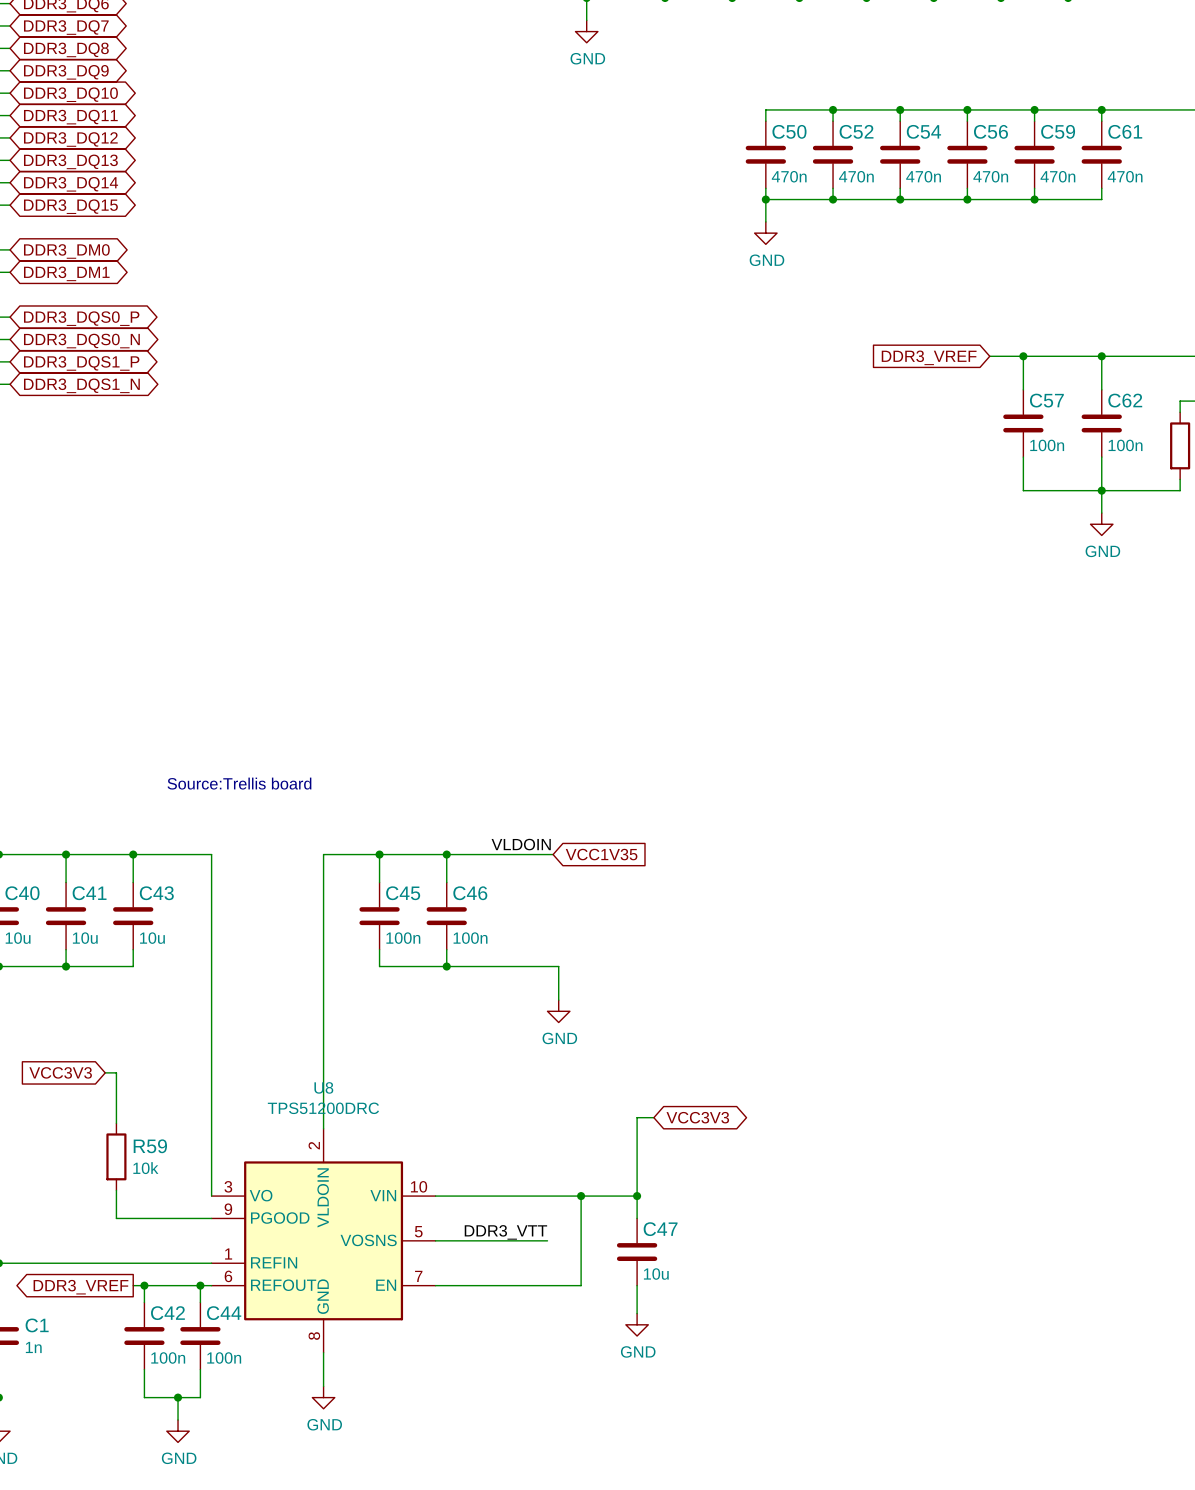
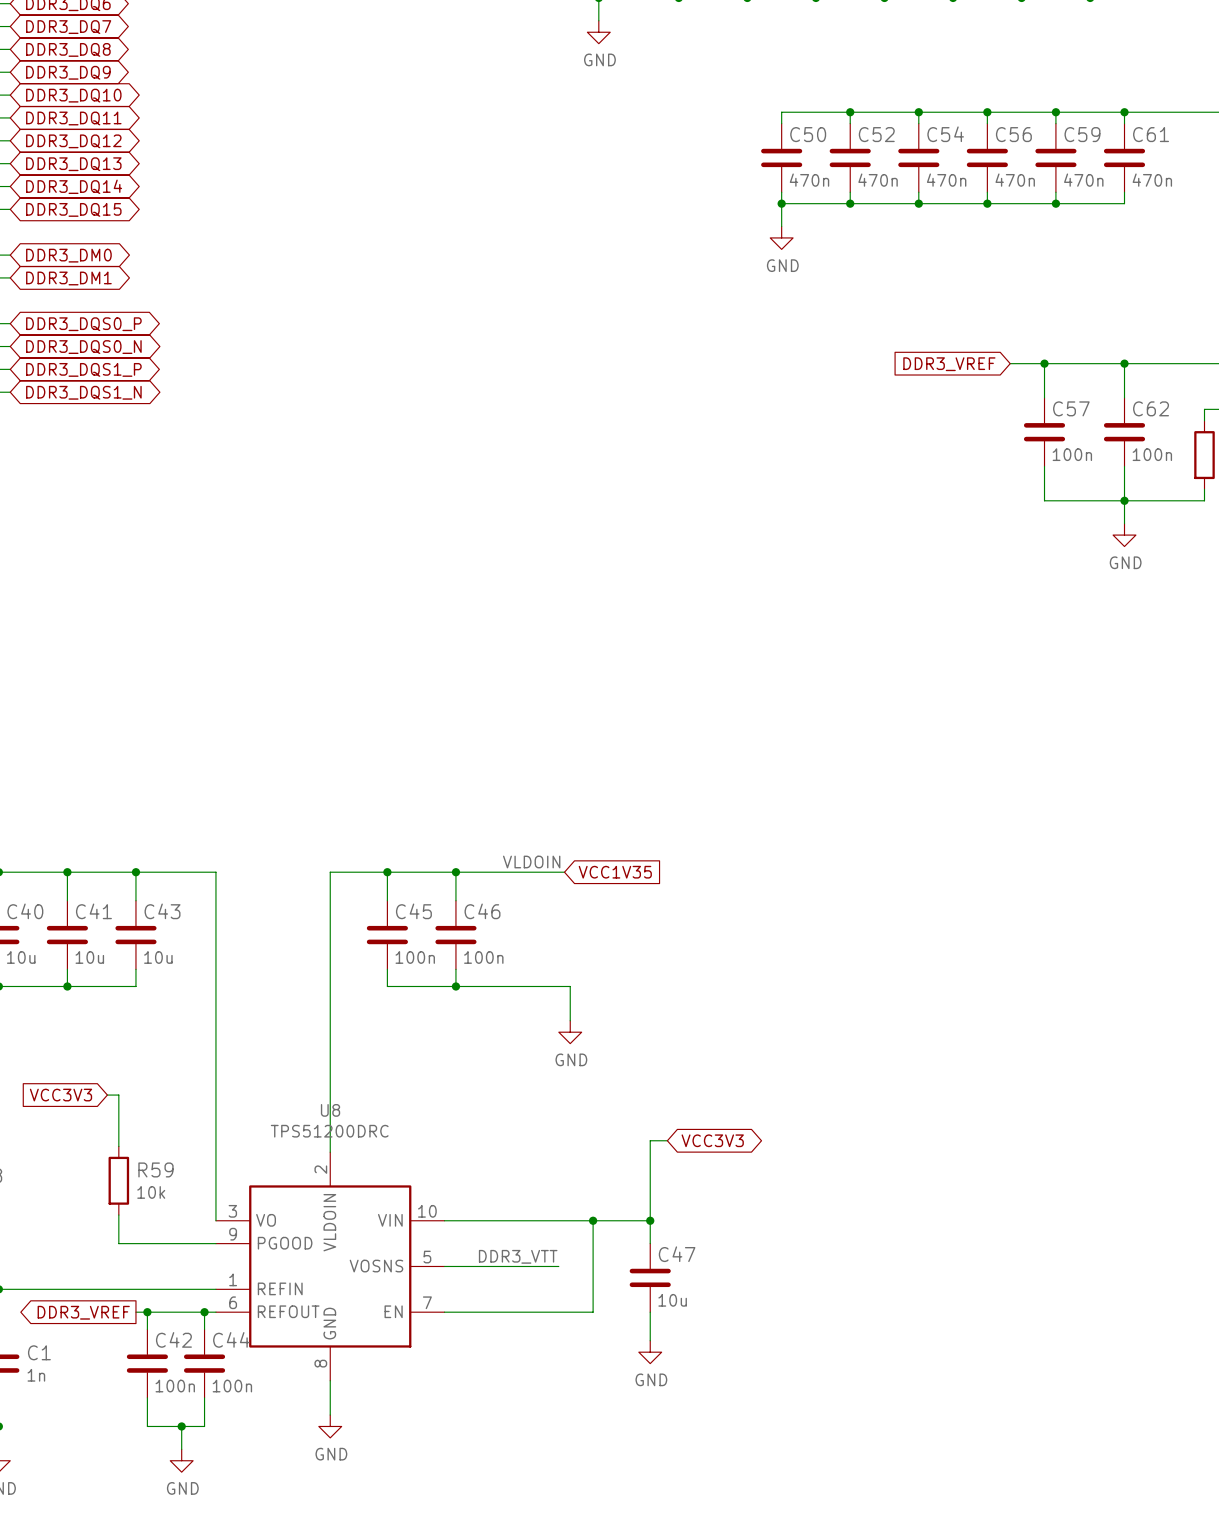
text: Source:Trellis board (239, 783) -> none

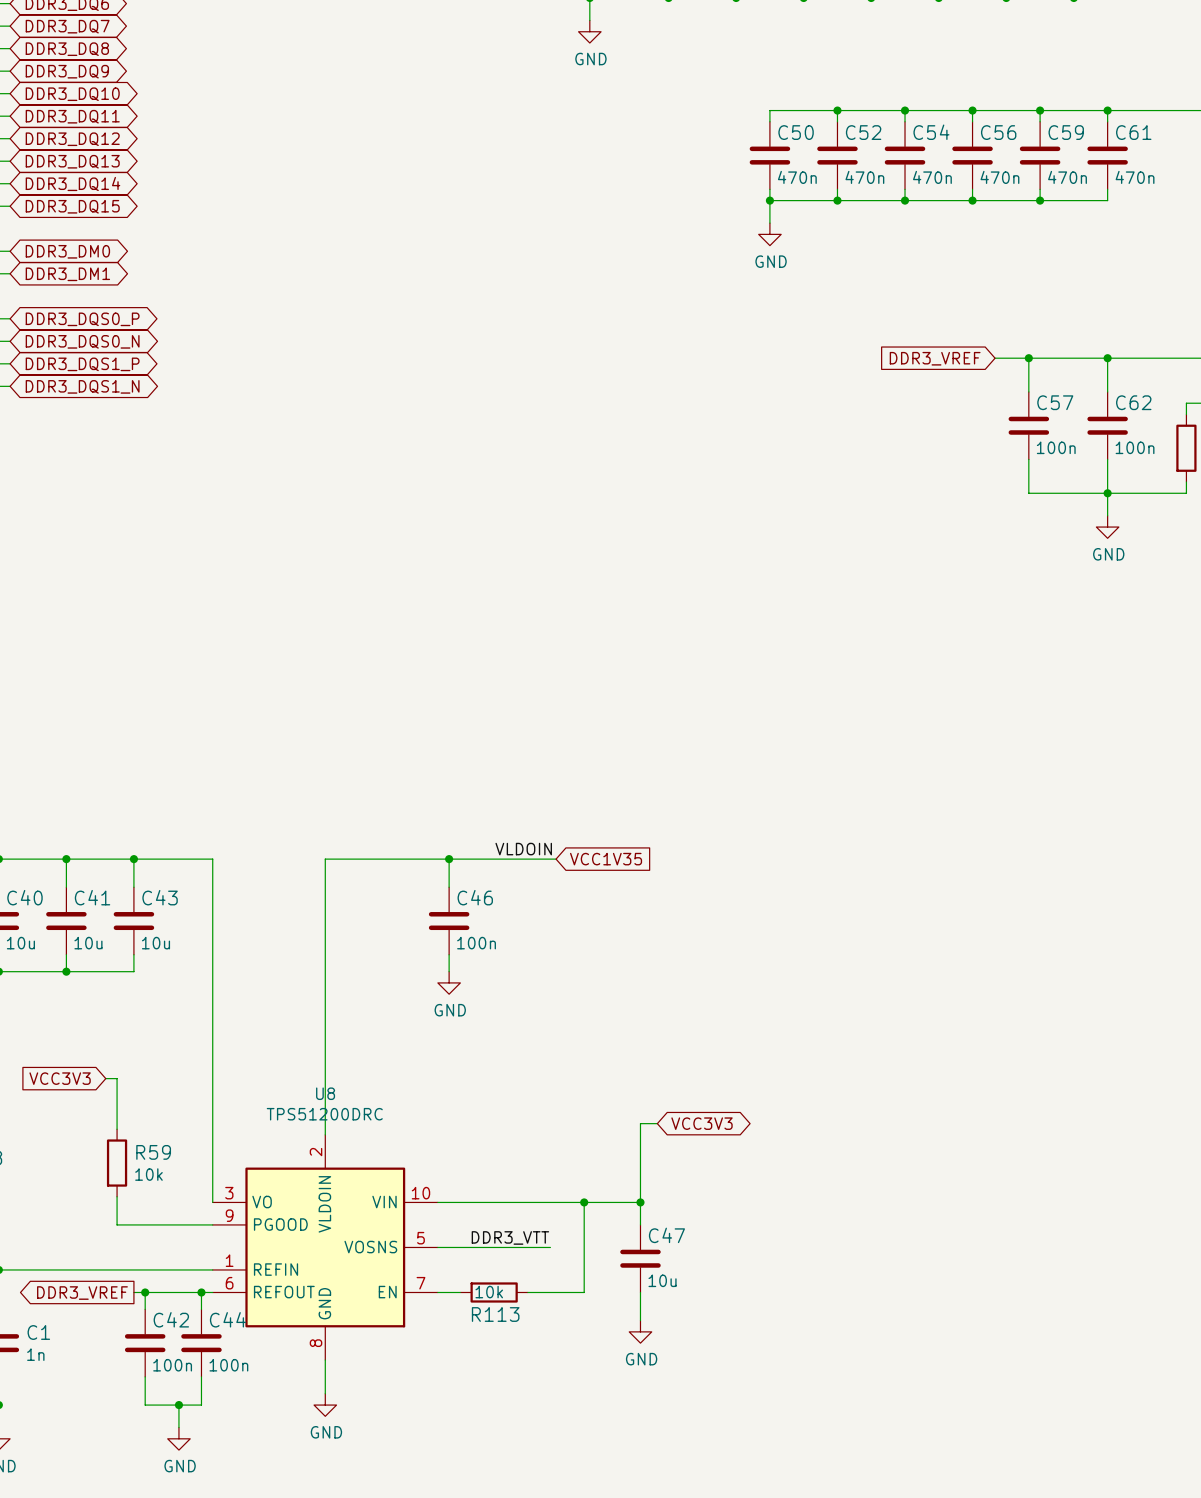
wire: (387, 872) (387, 900) -> none
junction: (387, 872) -> none
C45: (387, 935) -> none
wire: (387, 969) (387, 986) (570, 986) (570, 1020) -> none
junction: (455, 986) -> none
power symbol position: GND (570, 1032) -> GND (449, 982)
wire: (467, 1312) (535, 1312) -> none
R113: none -> (494, 1292)

